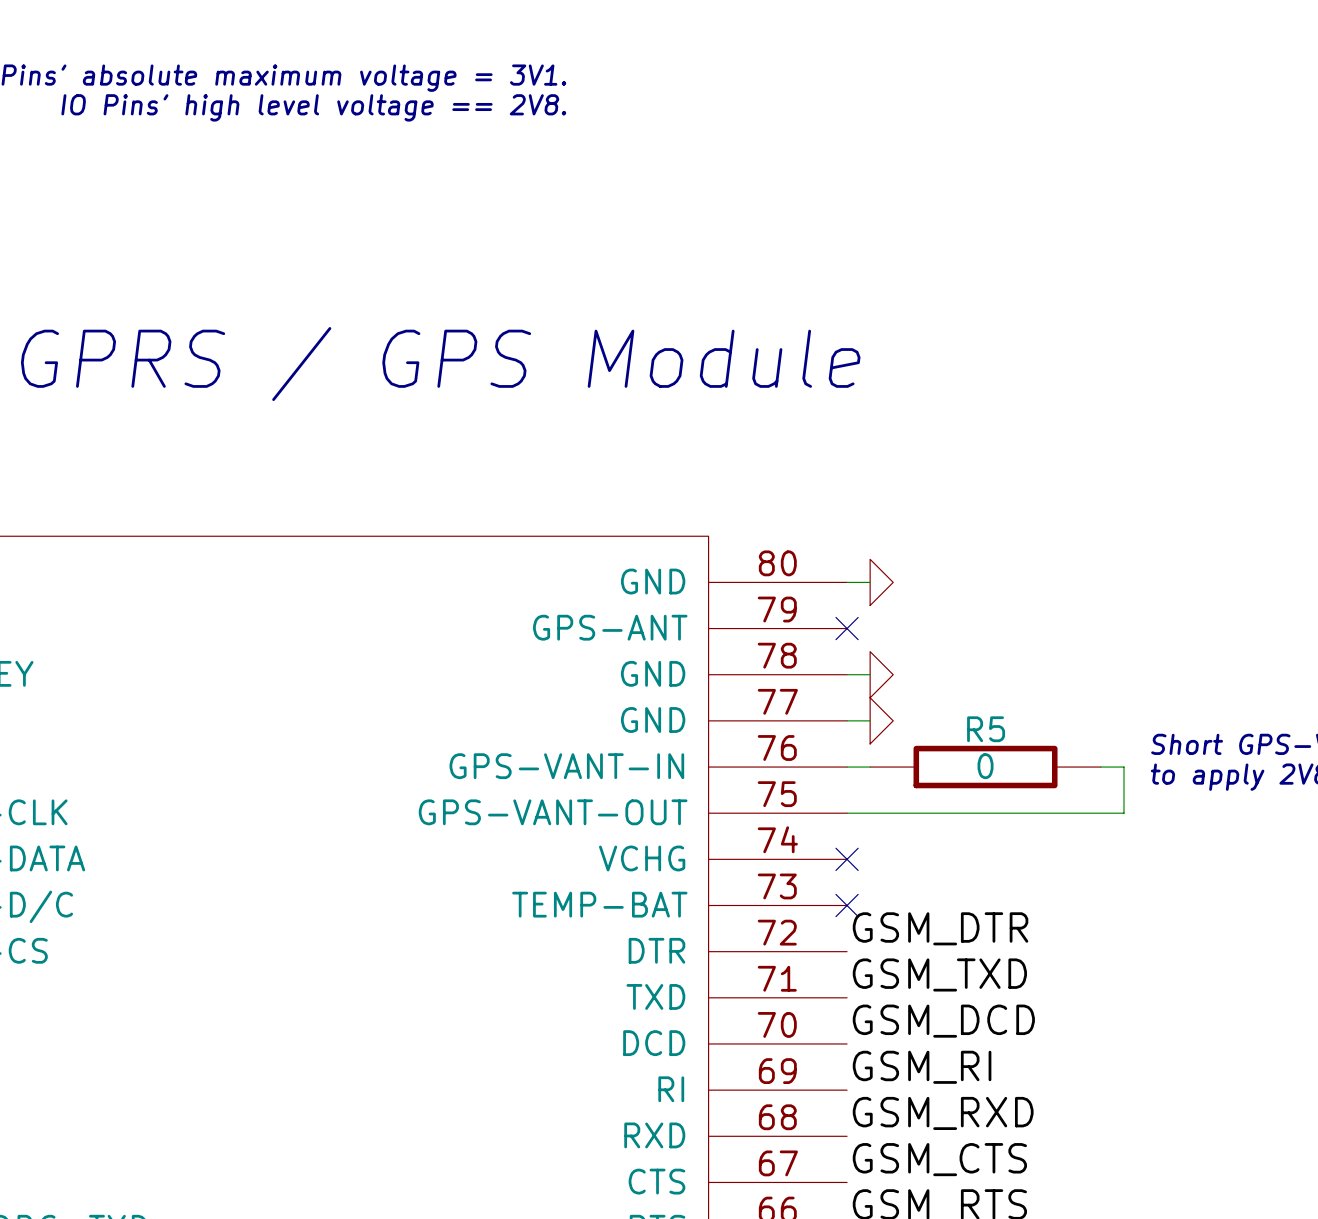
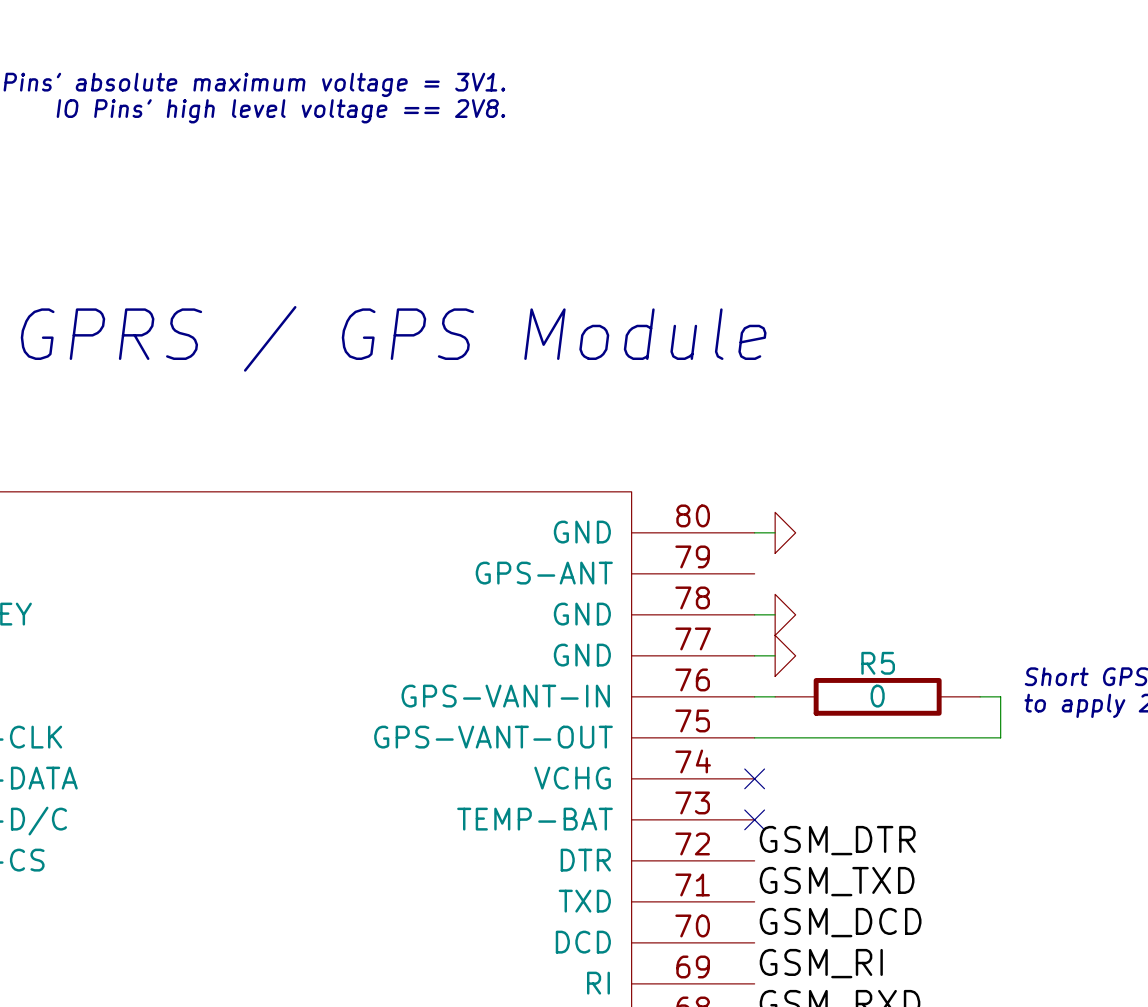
no-connect mark: (847, 628) -> none

